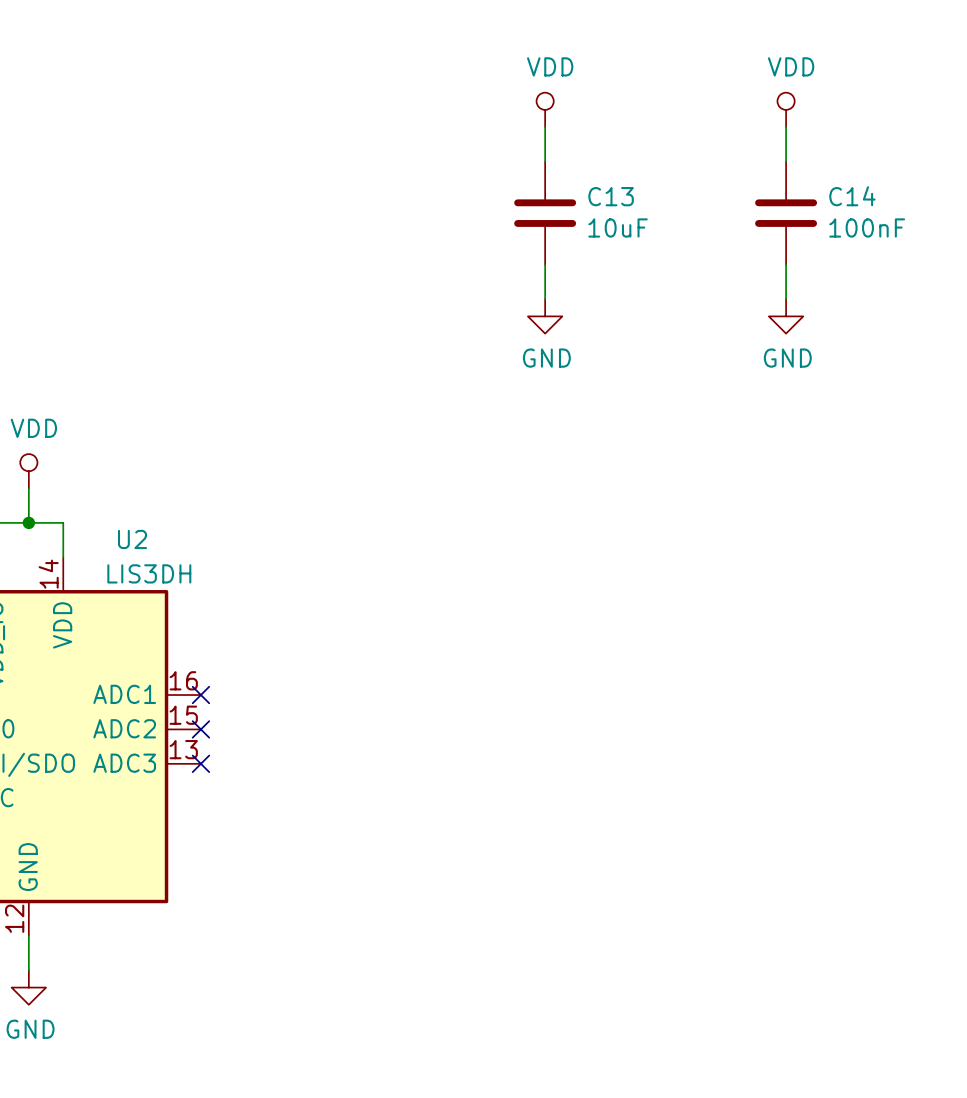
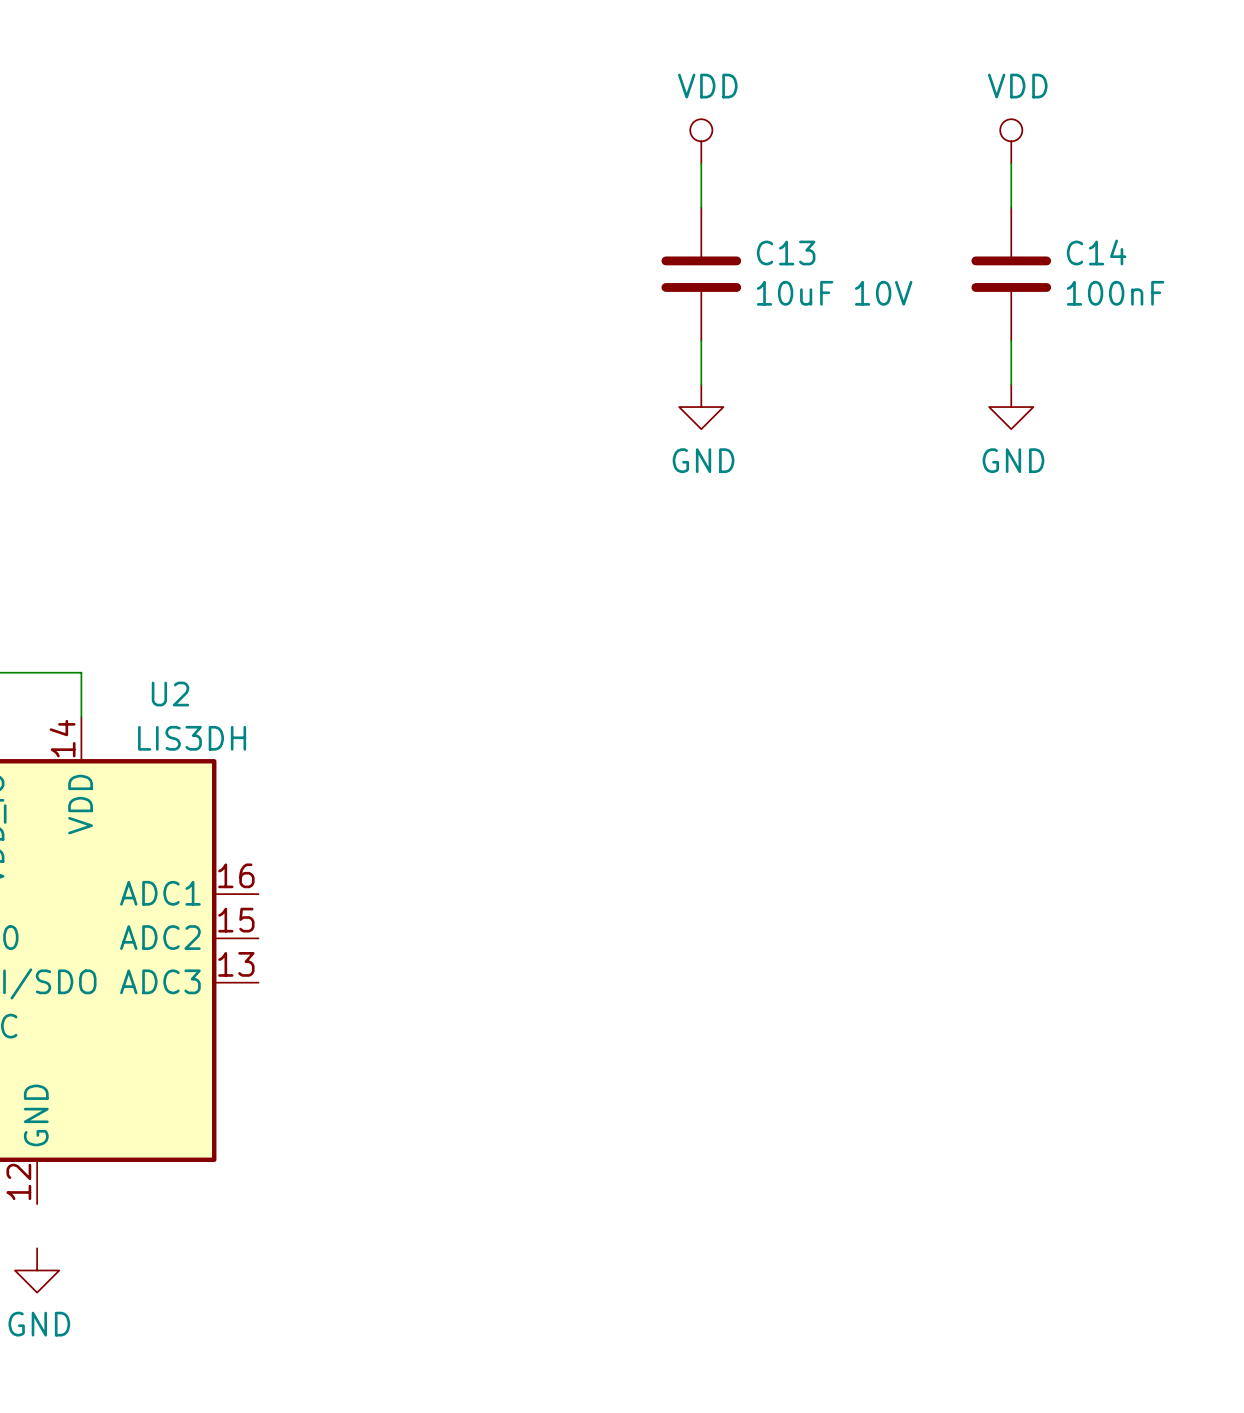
C13 value: 10uF (618, 227) -> 10uF 10V (834, 293)
power symbol: VDD (28, 471) -> none
wire: (28, 488) (28, 522) -> none
junction: (28, 522) -> none
no-connect mark: (200, 695) -> none
no-connect mark: (200, 729) -> none
no-connect mark: (200, 763) -> none
wire: (28, 935) (28, 970) -> none

